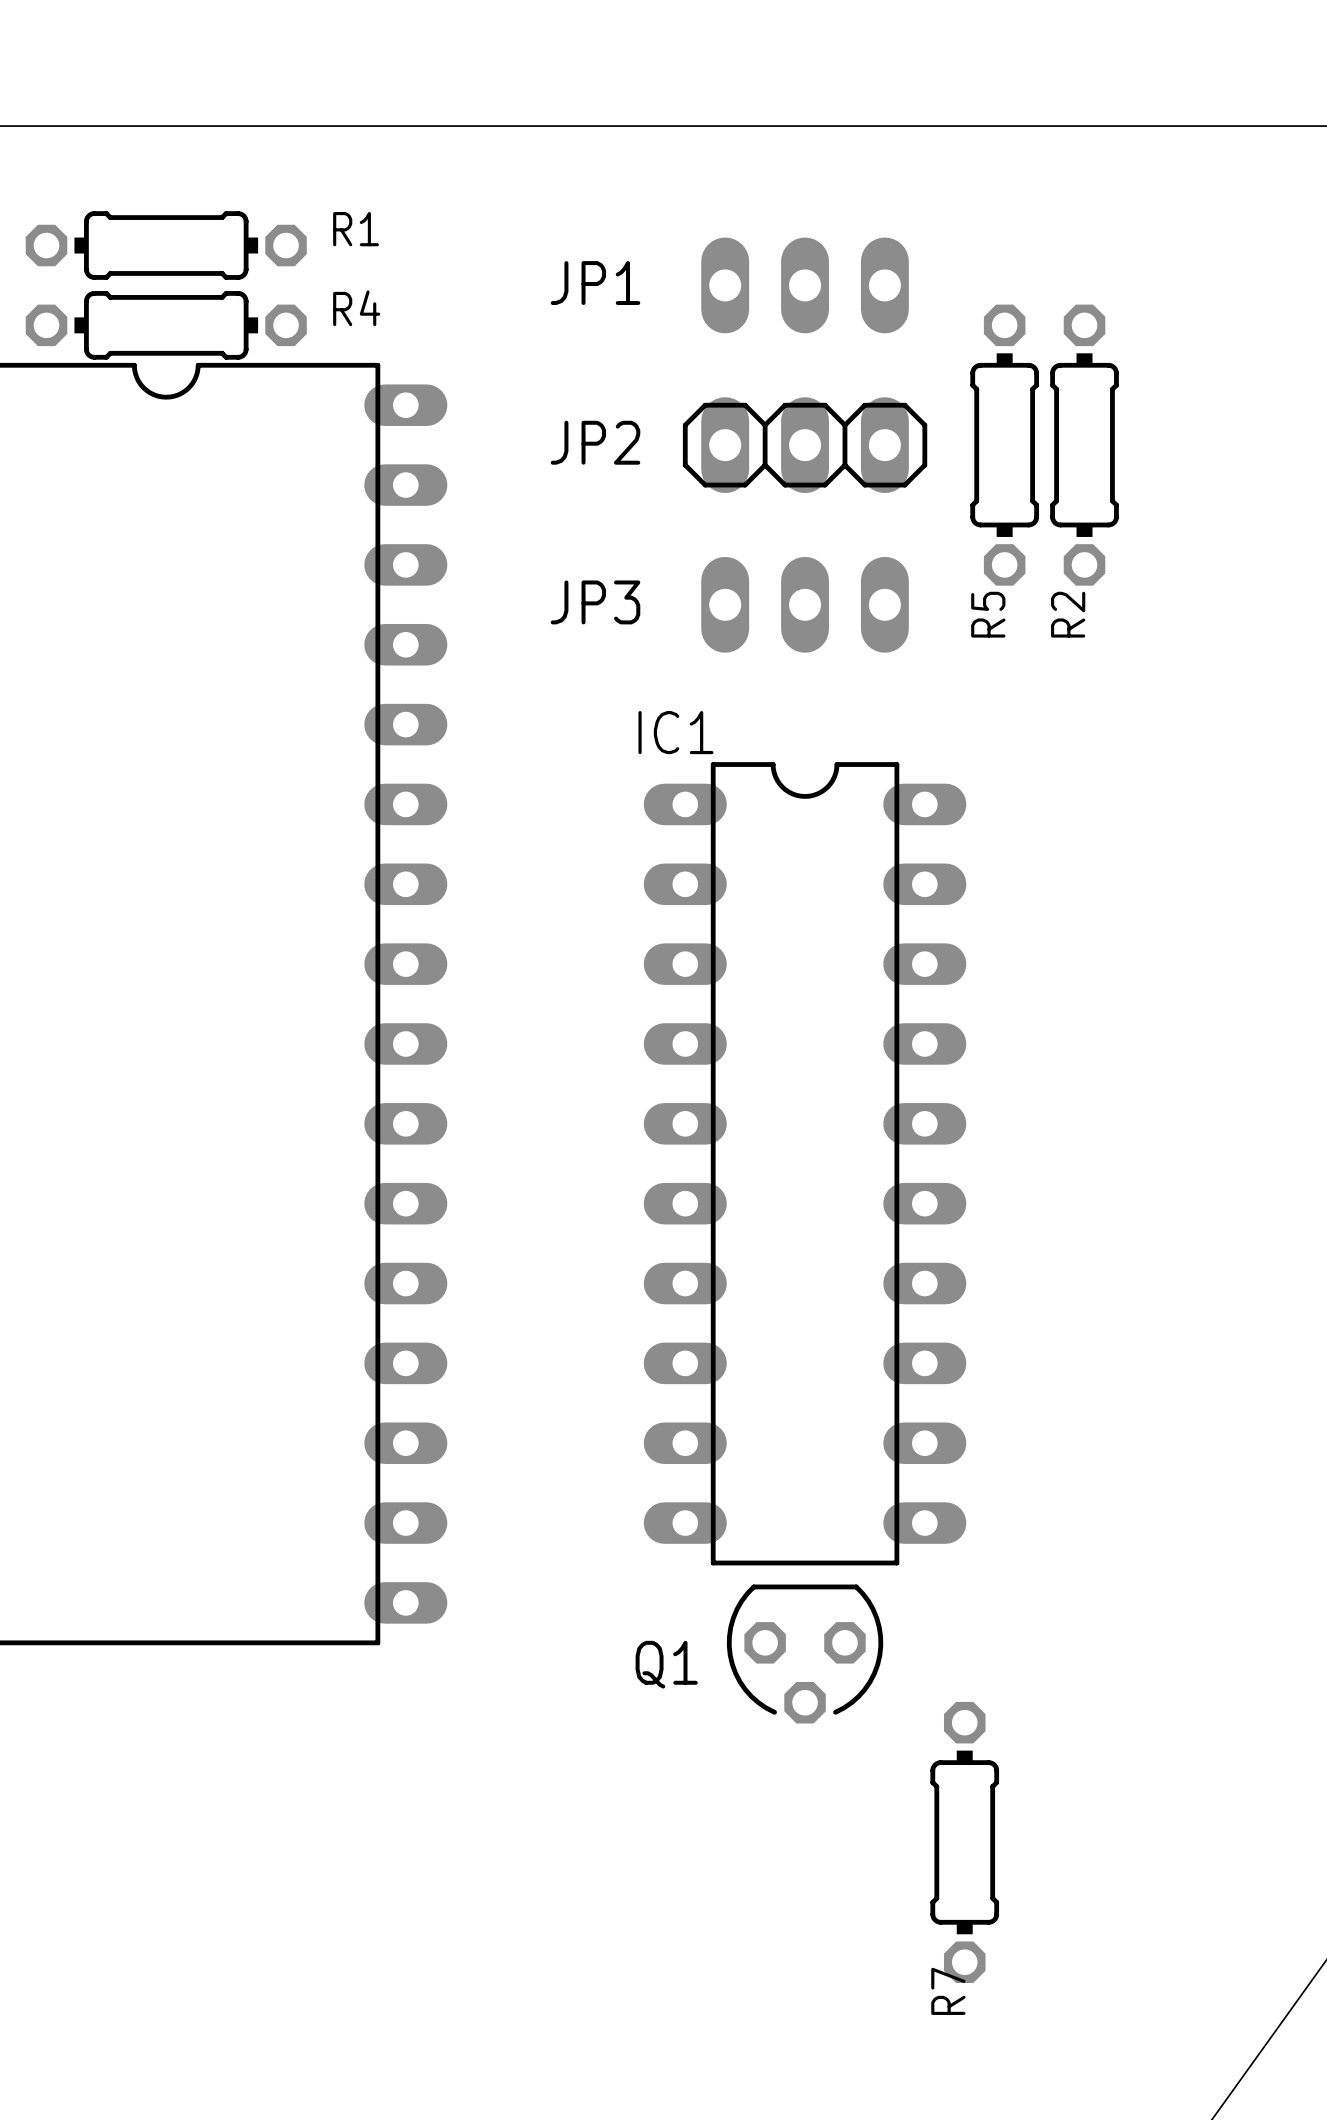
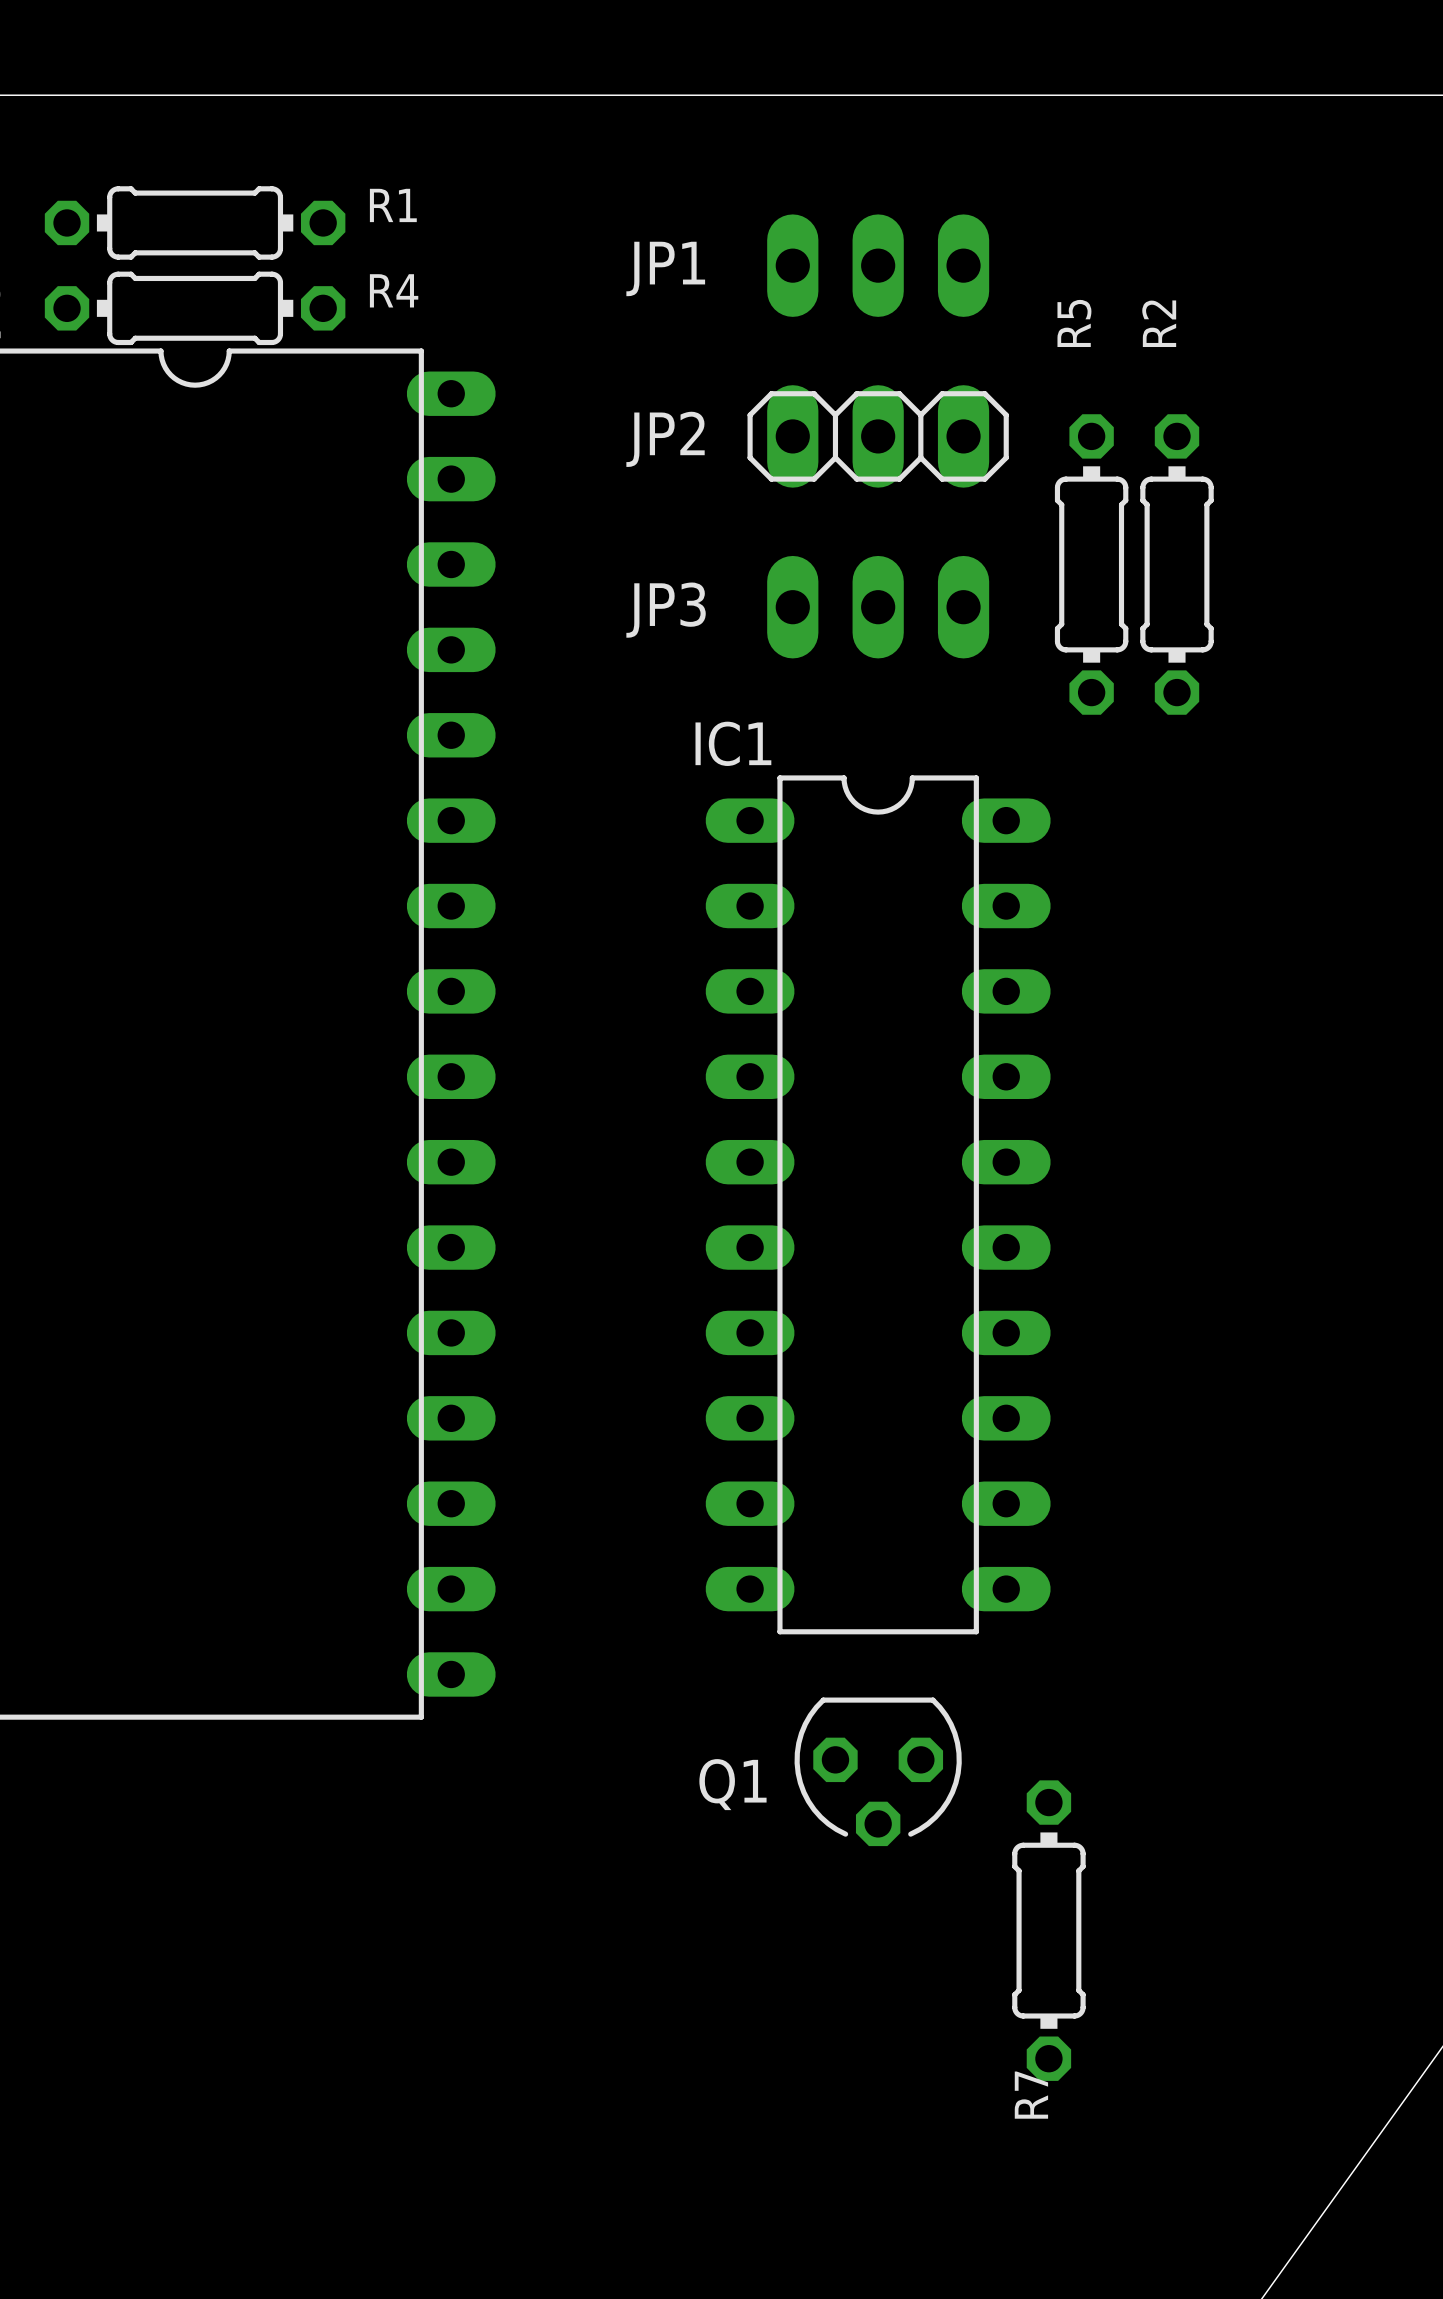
R5 position: (1004, 445) -> (1091, 564)
R2 position: (1084, 445) -> (1177, 564)
R5 name position: R5 (988, 614) -> R5 (1074, 323)
R2 name position: R2 (1068, 614) -> R2 (1159, 323)
Q1 position: (805, 1654) -> (878, 1771)

